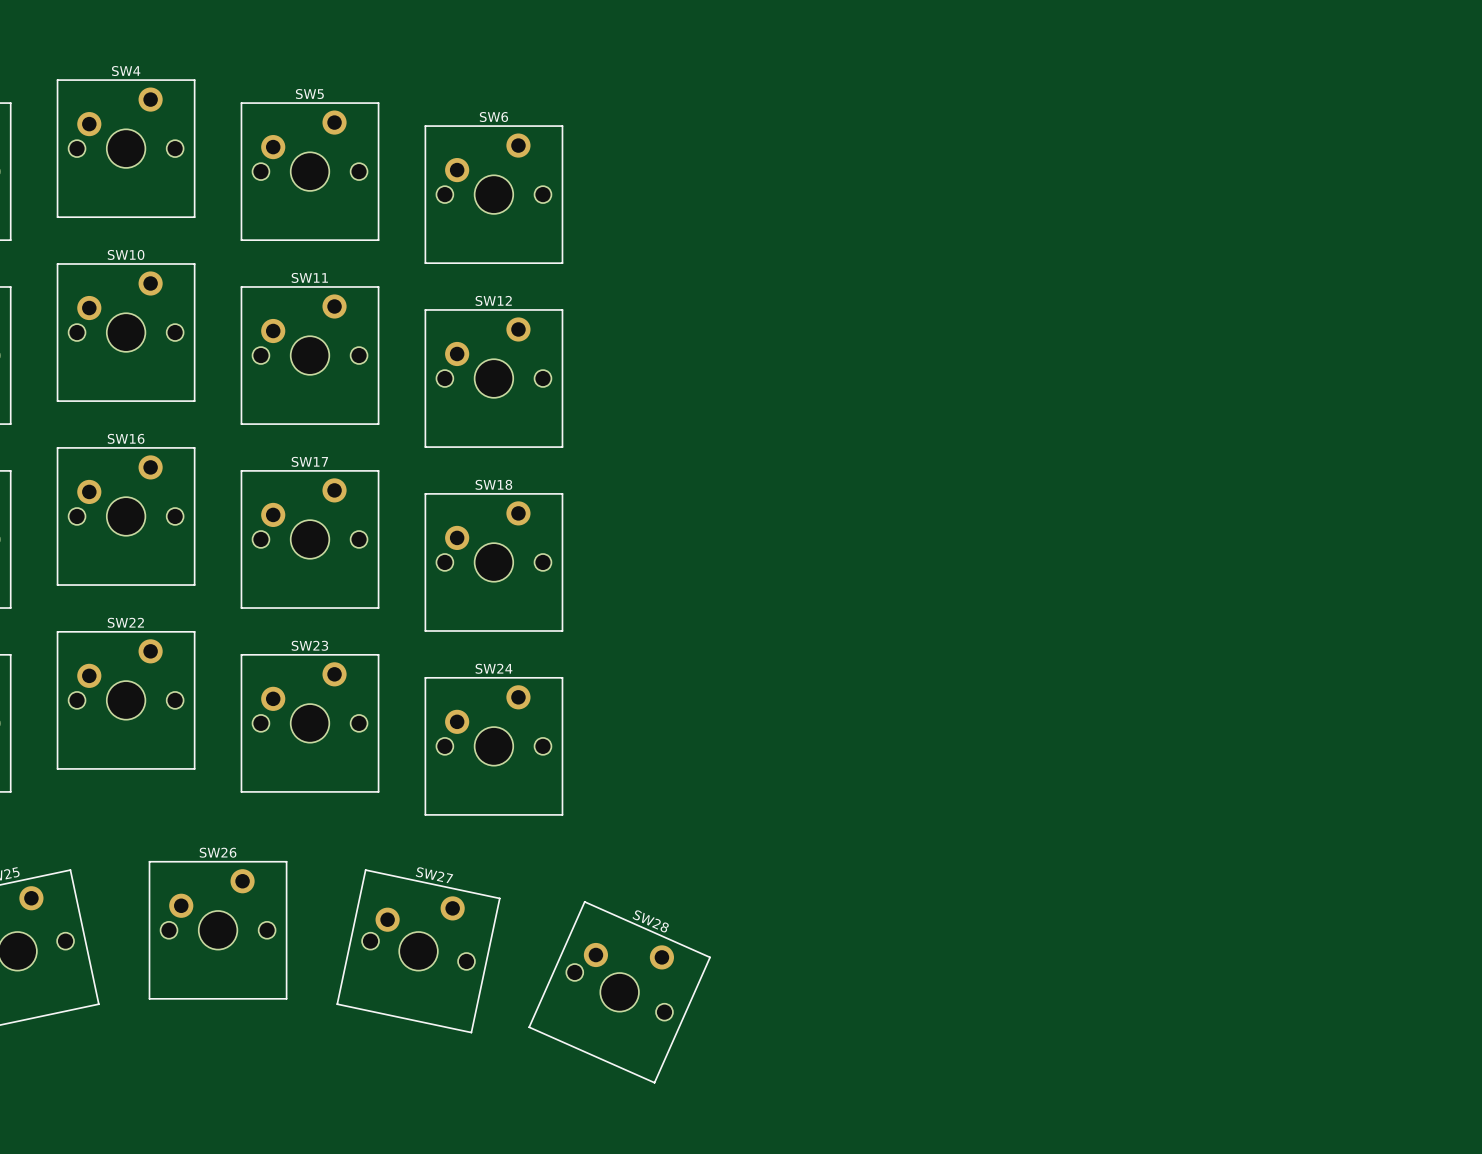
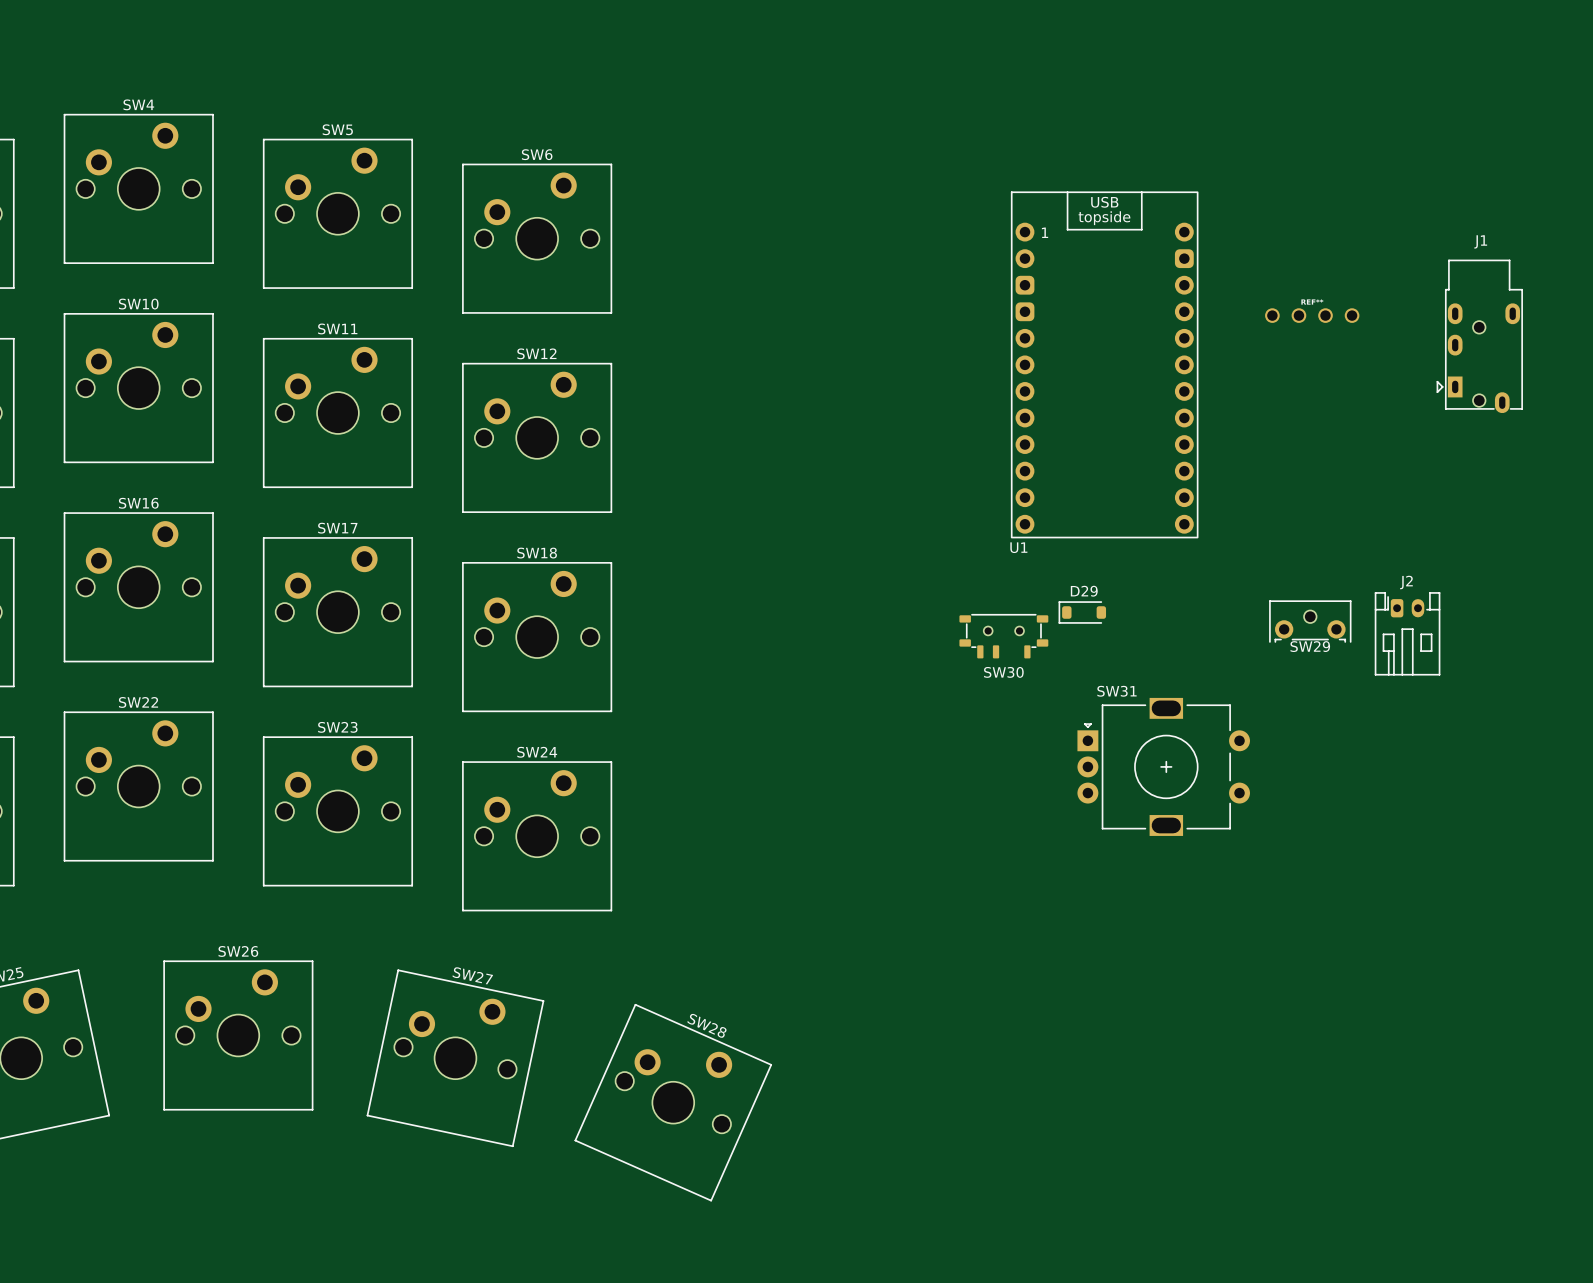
part: none -> (1312, 315)
J1: none -> (1479, 336)
U1: none -> (1104, 364)
D29: none -> (1082, 612)
SW29: none -> (1310, 621)
J2: none -> (1407, 633)
SW30: none -> (1003, 636)
SW31: none -> (1163, 766)

